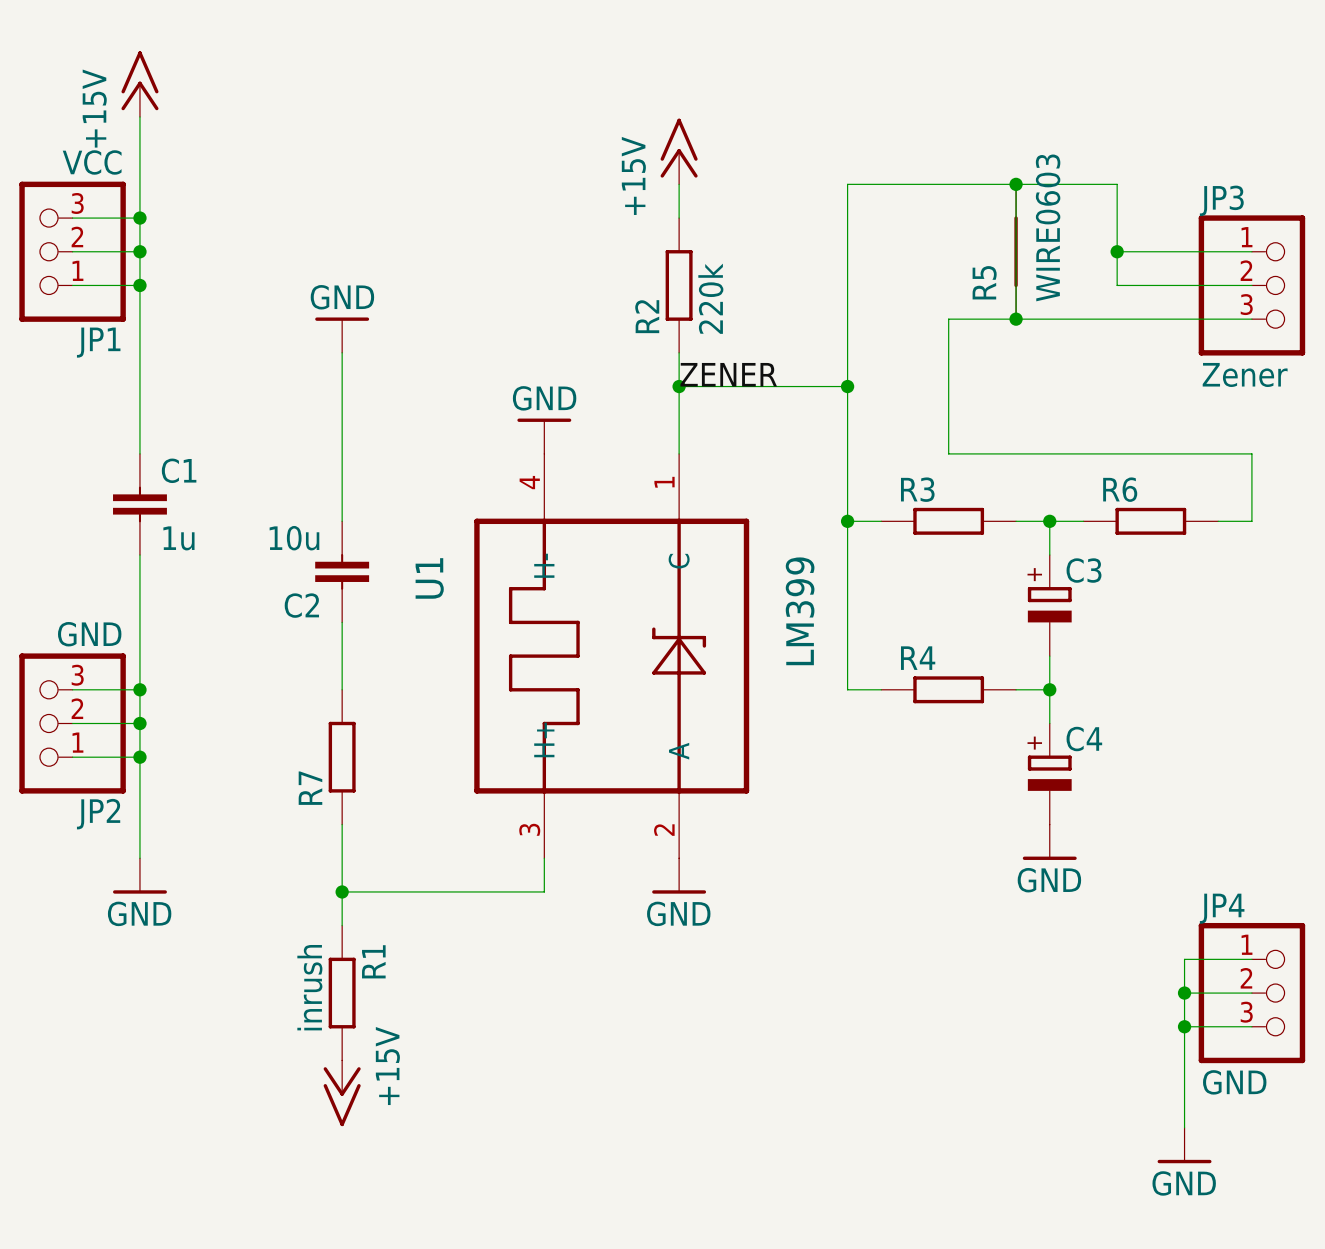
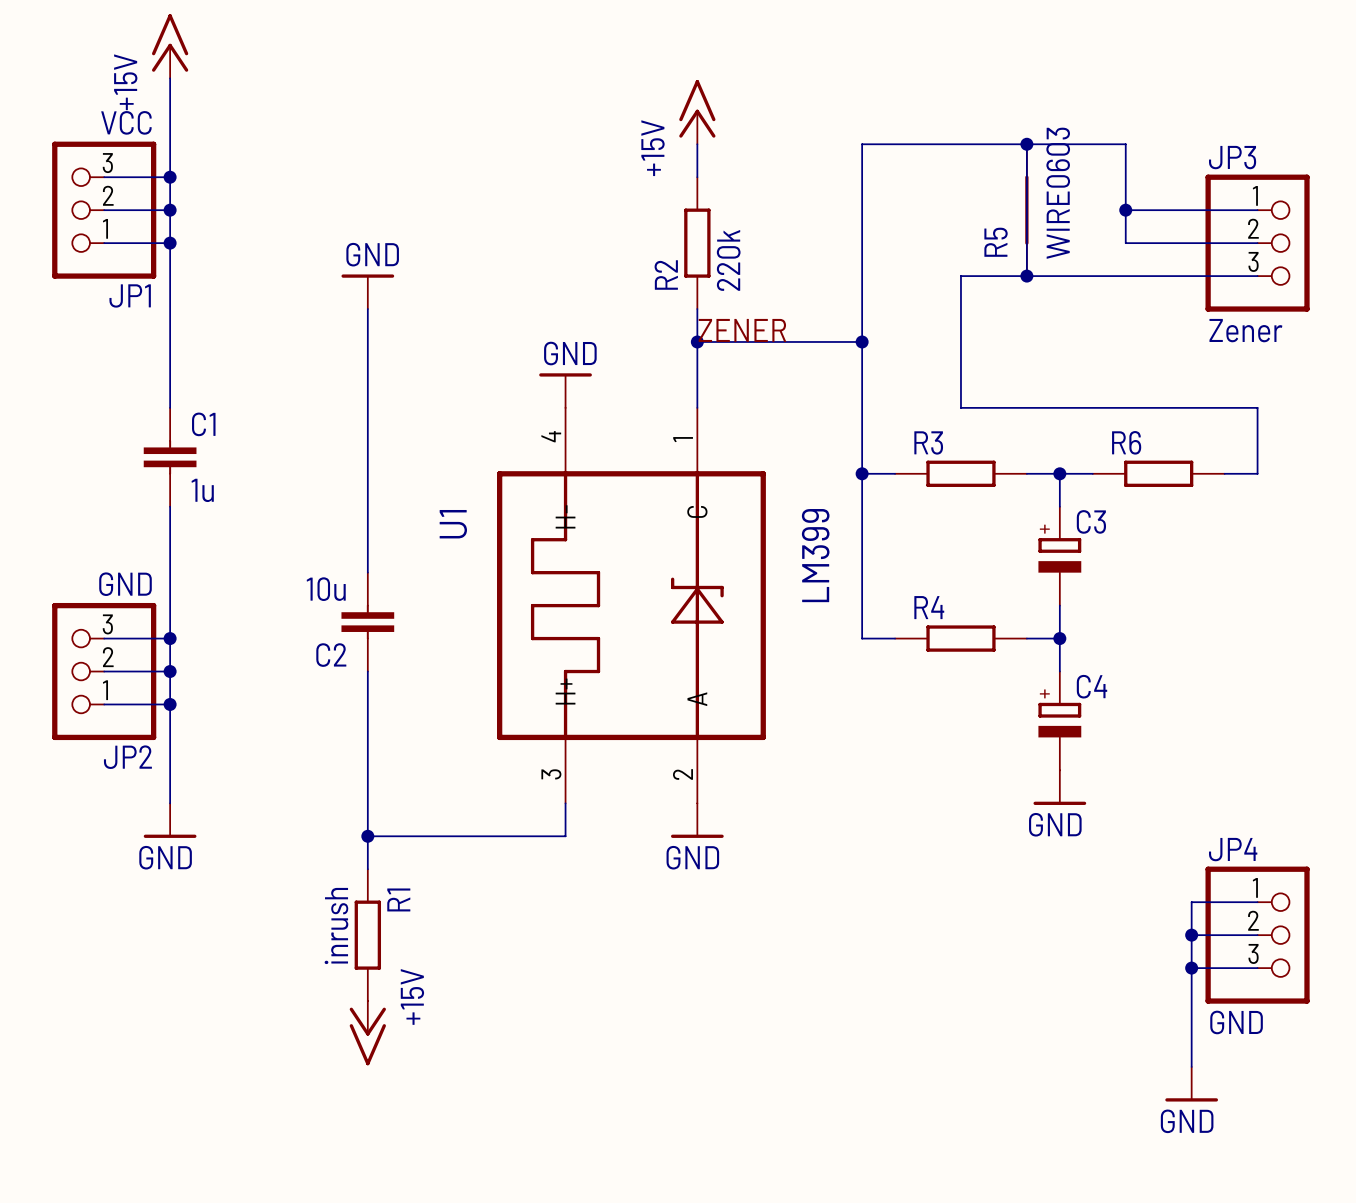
C2 position: (342, 571) -> (367, 622)
wire: none -> (367, 671) (367, 770)
R7: (342, 757) -> none

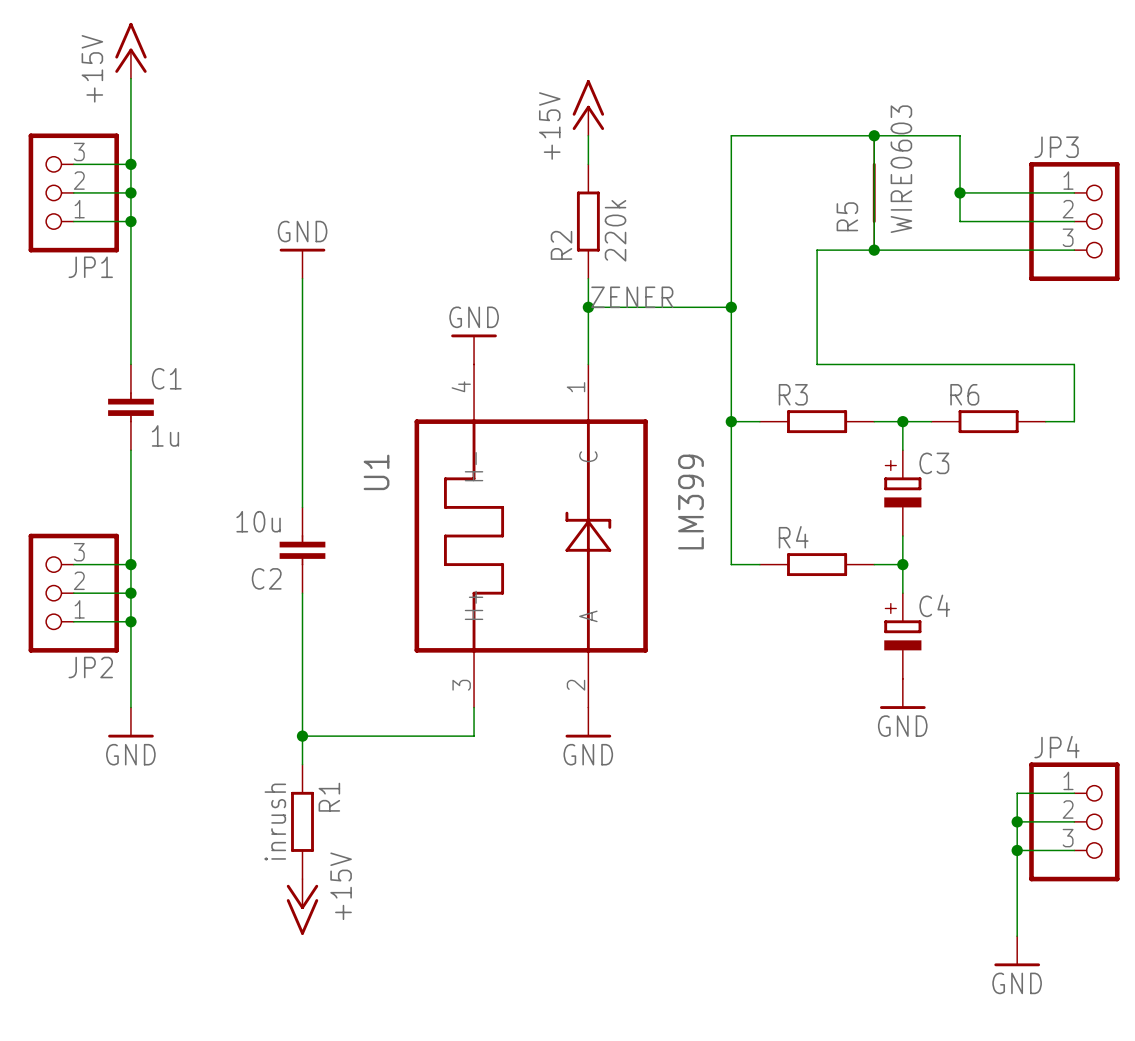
JP1 value: VCC (126, 122) -> none
JP3 value: Zener (1245, 330) -> none
JP2 value: GND (125, 584) -> none
JP4 value: GND (1236, 1022) -> none

